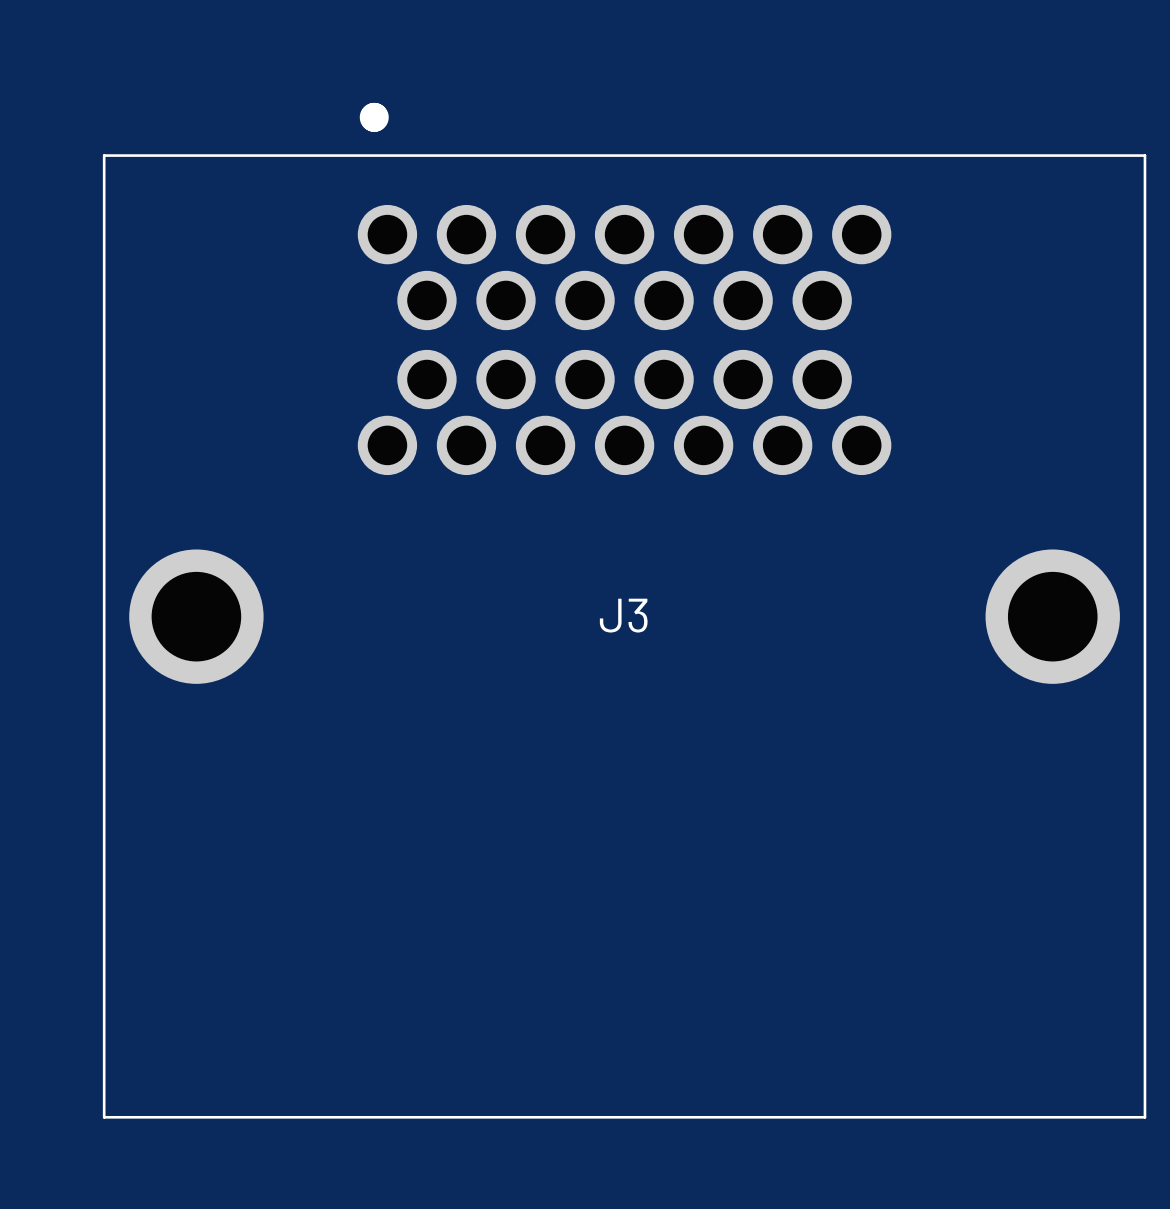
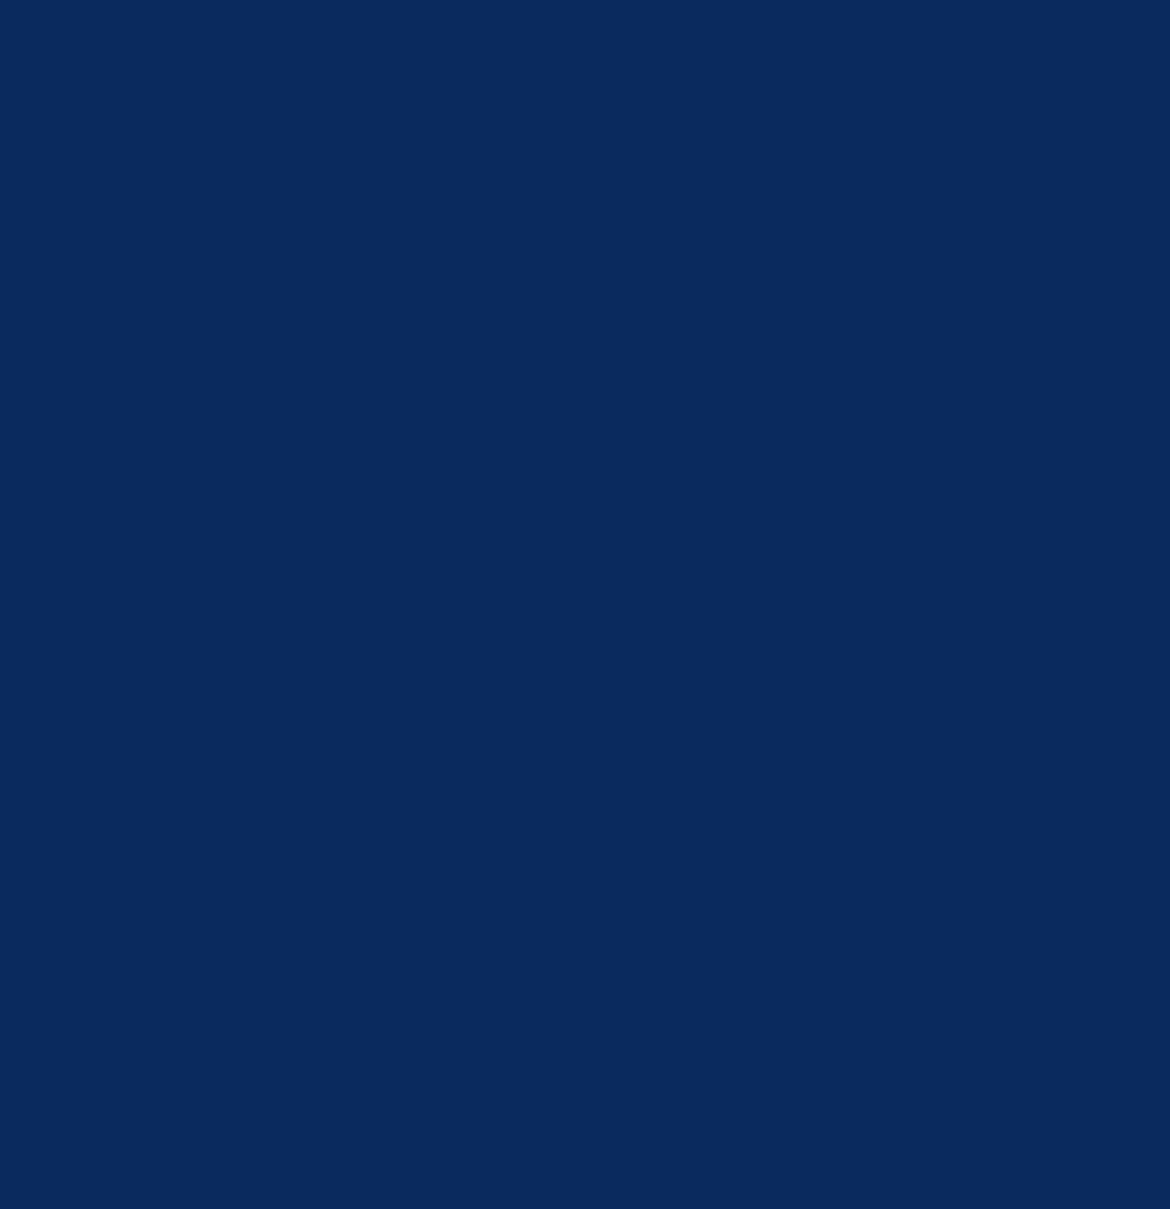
J3: (624, 610) -> none

